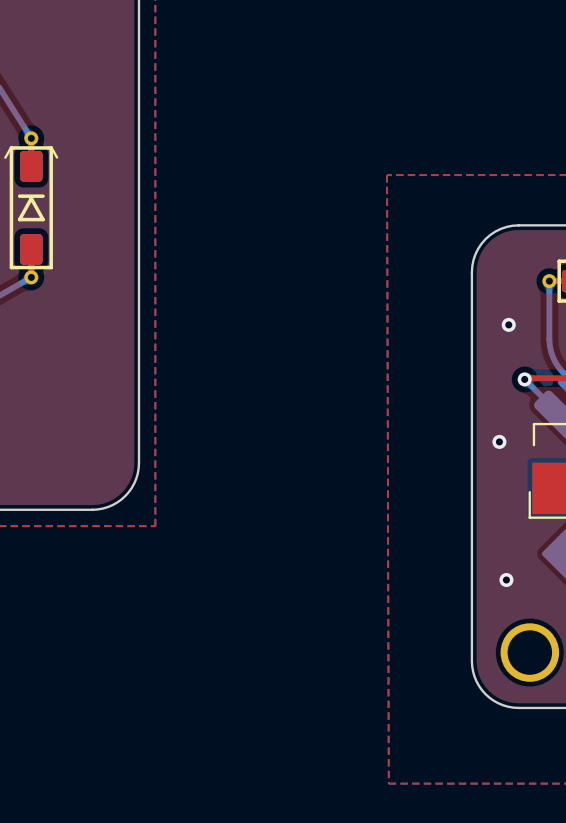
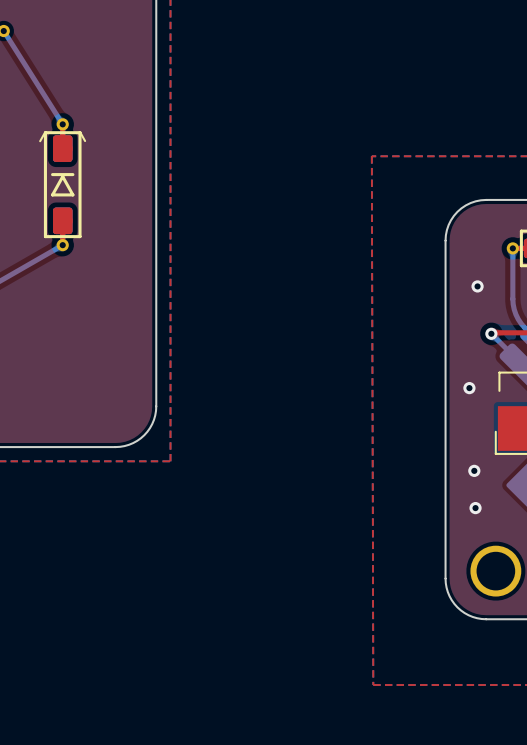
via: none -> (474, 470)

